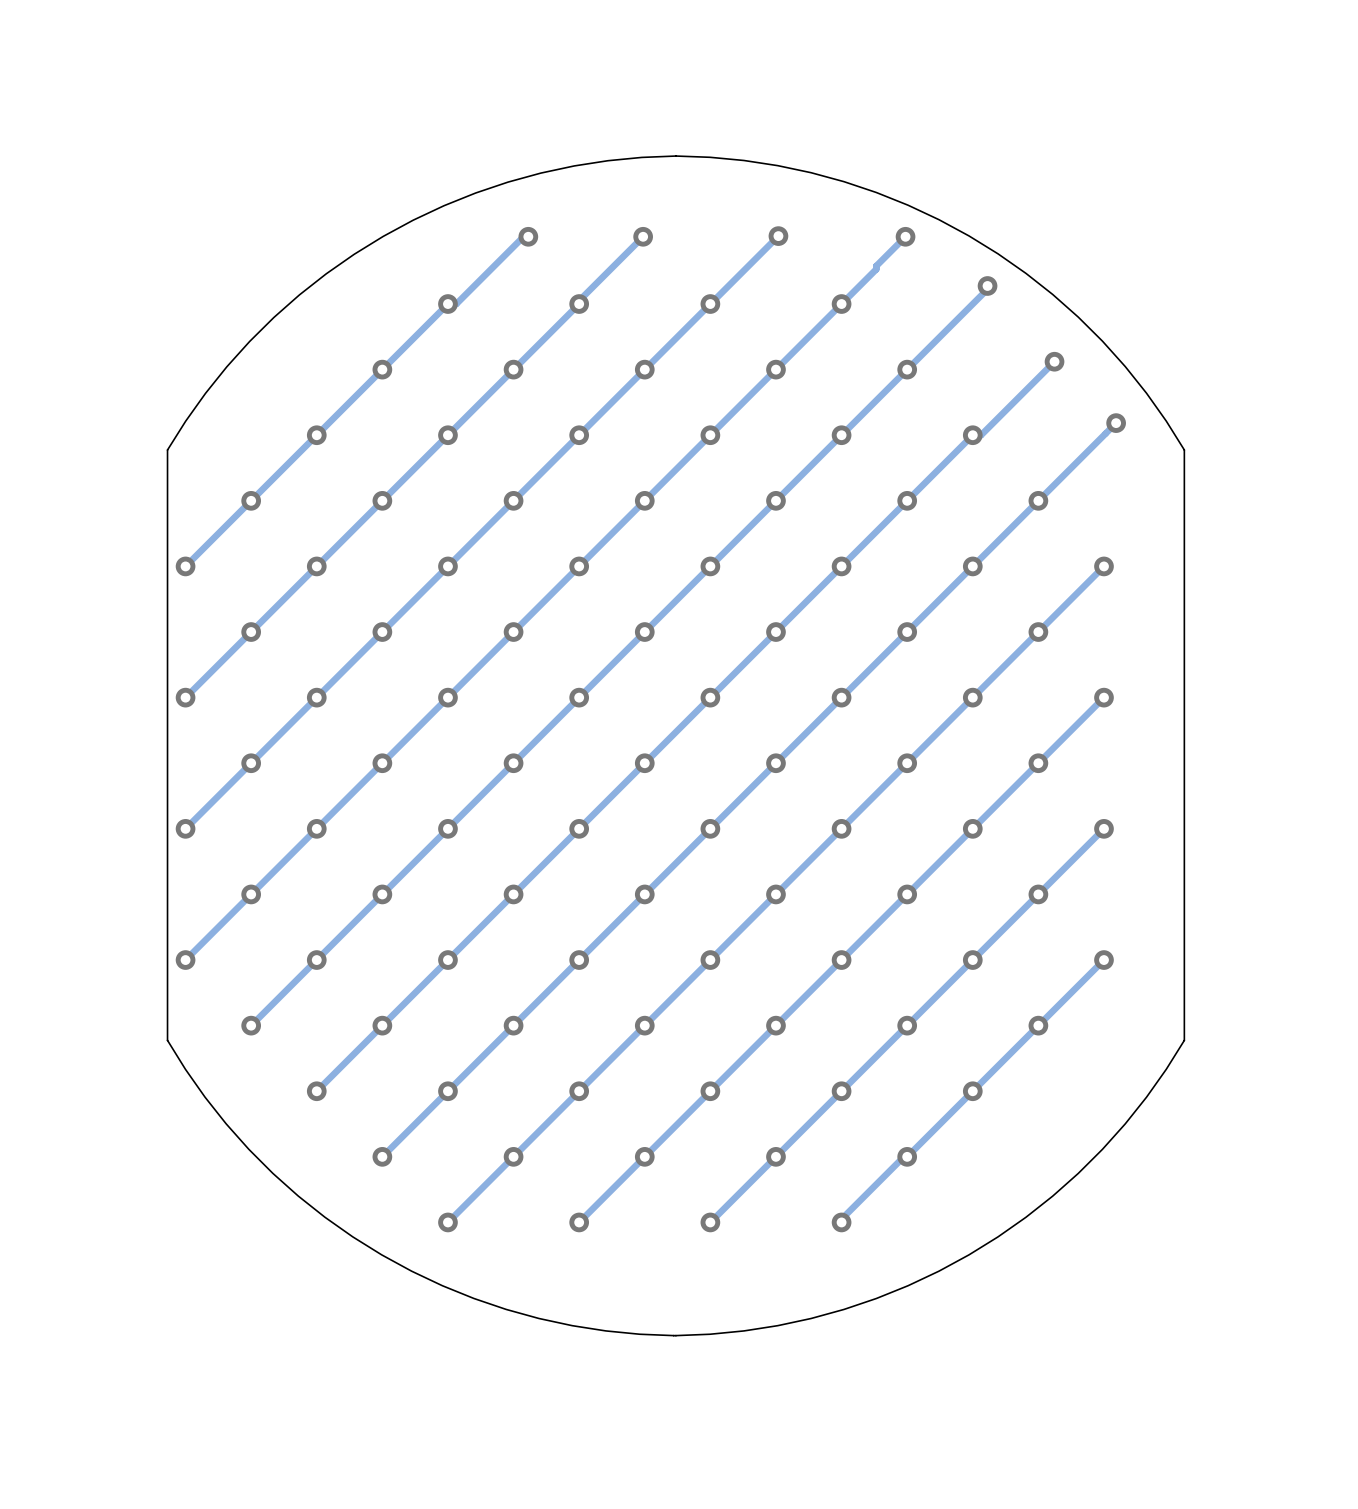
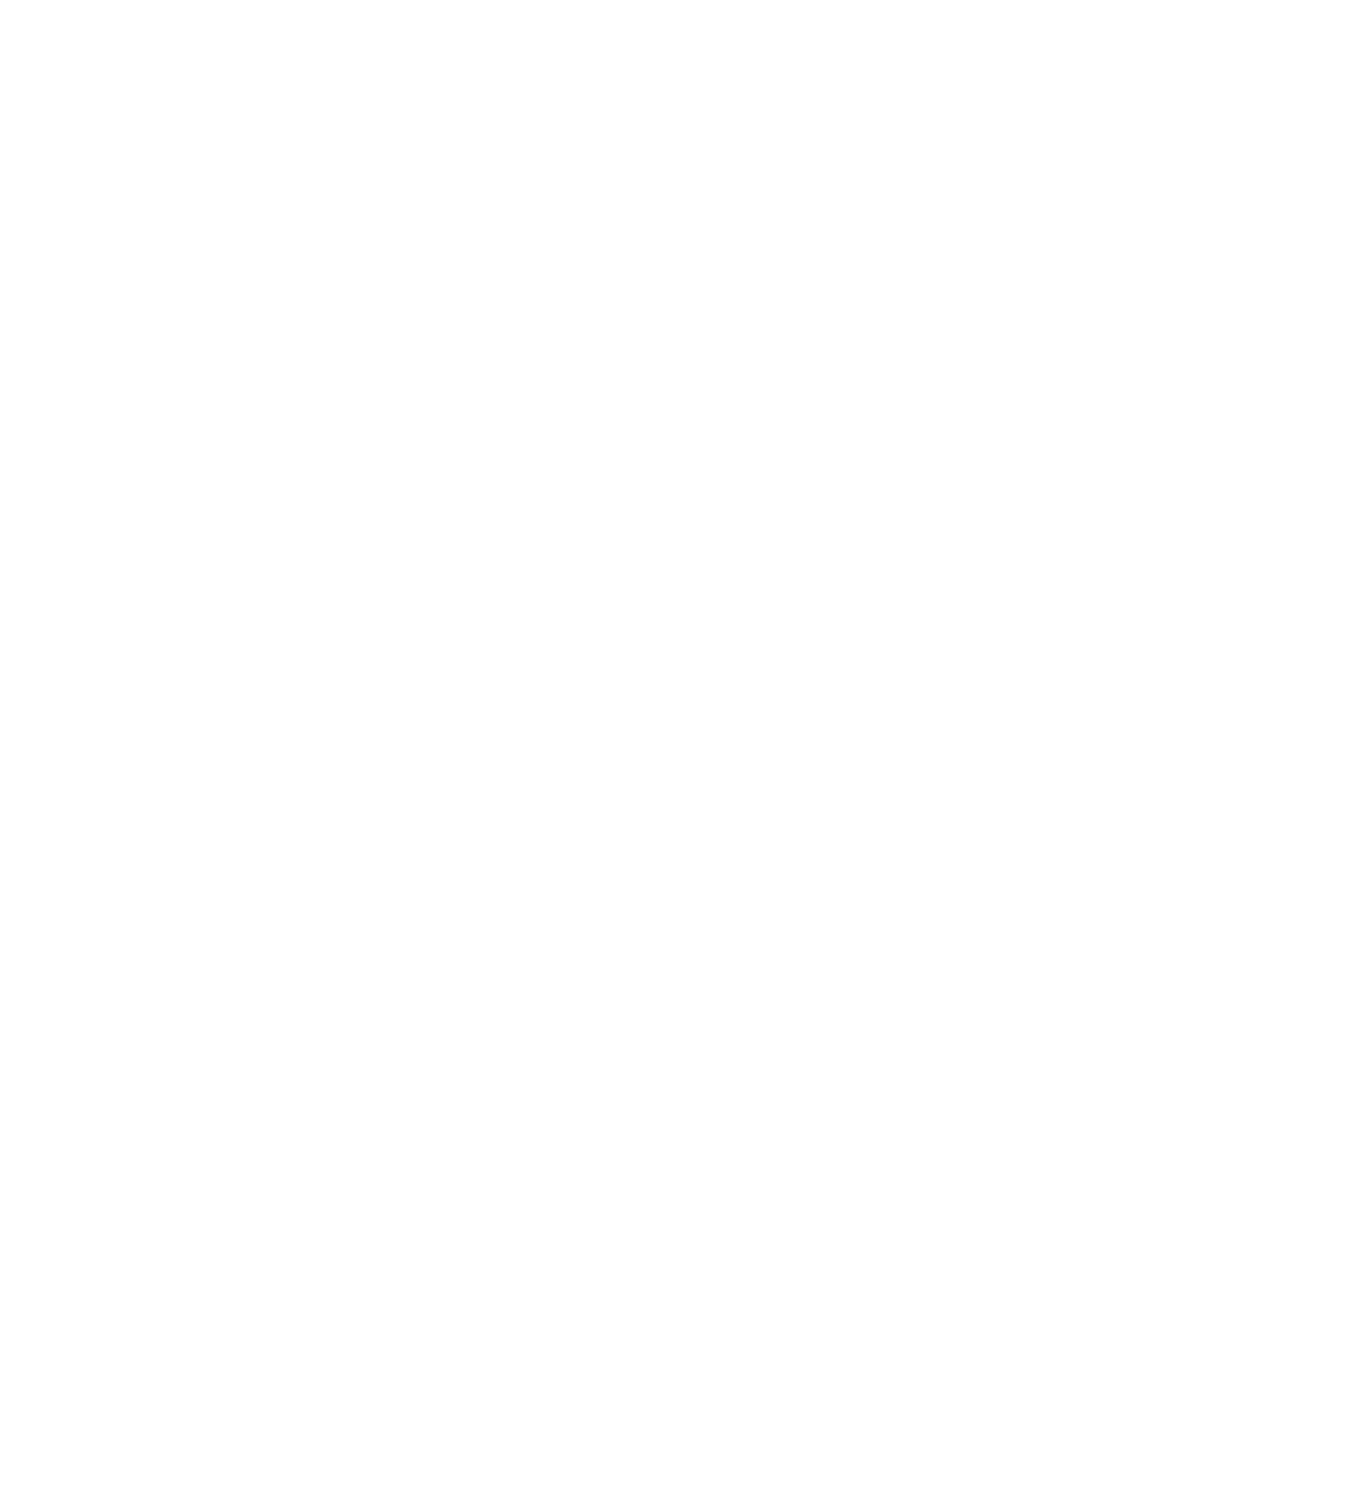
board edge: (675, 156) (744, 160) (811, 172) (876, 192) (938, 219) (968, 235) (1025, 273) (1052, 294) (1102, 341) (1146, 393) (1184, 449) (1184, 1040) (1146, 1097) (1102, 1149) (1052, 1196) (997, 1236) (968, 1254) (938, 1271) (876, 1298) (811, 1318) (744, 1330) (673, 1335) (605, 1330) (572, 1325) (506, 1309) (442, 1285) (381, 1254) (324, 1217) (272, 1173) (226, 1123) (205, 1097) (167, 1040) (167, 449) (205, 393) (226, 366) (273, 317) (326, 273) (383, 236) (444, 205) (508, 182) (540, 173) (607, 160) (675, 156) -> none
track: (528, 236) (523, 236) (456, 304) (447, 304) (185, 566) -> none
via: (528, 236) -> none
track: (643, 236) (579, 300) (579, 304) (185, 697) -> none
via: (643, 236) -> none
track: (778, 236) (185, 828) -> none
via: (778, 236) -> none
track: (905, 236) (876, 266) (876, 269) (185, 960) -> none
via: (905, 236) -> none
track: (987, 285) (987, 289) (251, 1025) -> none
via: (987, 285) -> none
via: (447, 304) -> none
via: (579, 304) -> none
via: (710, 304) -> none
via: (841, 304) -> none
track: (1054, 361) (981, 435) (972, 435) (316, 1091) -> none
via: (1054, 361) -> none
via: (382, 369) -> none
via: (513, 369) -> none
via: (644, 369) -> none
via: (775, 369) -> none
via: (907, 369) -> none
track: (1116, 423) (382, 1156) -> none
via: (1116, 423) -> none
via: (316, 435) -> none
via: (447, 435) -> none
via: (579, 435) -> none
via: (710, 435) -> none
via: (841, 435) -> none
via: (972, 435) -> none
via: (251, 500) -> none
via: (382, 500) -> none
via: (513, 500) -> none
via: (644, 500) -> none
via: (775, 500) -> none
via: (907, 500) -> none
via: (1038, 500) -> none
via: (185, 566) -> none
via: (316, 566) -> none
via: (447, 566) -> none
via: (579, 566) -> none
via: (710, 566) -> none
via: (841, 566) -> none
via: (972, 566) -> none
track: (1103, 566) (447, 1222) -> none
via: (1103, 566) -> none
via: (251, 632) -> none
via: (382, 632) -> none
via: (513, 632) -> none
via: (644, 632) -> none
via: (775, 632) -> none
via: (907, 632) -> none
via: (1038, 632) -> none
via: (185, 697) -> none
via: (316, 697) -> none
via: (447, 697) -> none
via: (579, 697) -> none
via: (710, 697) -> none
via: (841, 697) -> none
via: (972, 697) -> none
track: (1103, 697) (579, 1222) -> none
via: (1103, 697) -> none
via: (251, 763) -> none
via: (382, 763) -> none
via: (513, 763) -> none
via: (644, 763) -> none
via: (775, 763) -> none
via: (907, 763) -> none
via: (1038, 763) -> none
via: (185, 828) -> none
via: (316, 828) -> none
via: (447, 828) -> none
via: (579, 828) -> none
via: (710, 828) -> none
via: (841, 828) -> none
via: (972, 828) -> none
track: (1103, 828) (710, 1222) -> none
via: (1103, 828) -> none
via: (251, 894) -> none
via: (382, 894) -> none
via: (513, 894) -> none
via: (644, 894) -> none
via: (775, 894) -> none
via: (907, 894) -> none
via: (1038, 894) -> none
via: (185, 960) -> none
via: (316, 960) -> none
via: (447, 960) -> none
via: (579, 960) -> none
via: (710, 960) -> none
via: (841, 960) -> none
via: (972, 960) -> none
track: (1103, 960) (907, 1156) (905, 1155) (841, 1219) (841, 1222) -> none
via: (1103, 960) -> none
via: (251, 1025) -> none
via: (382, 1025) -> none
via: (513, 1025) -> none
via: (644, 1025) -> none
via: (775, 1025) -> none
via: (907, 1025) -> none
via: (1038, 1025) -> none
via: (316, 1091) -> none
via: (447, 1091) -> none
via: (579, 1091) -> none
via: (710, 1091) -> none
via: (841, 1091) -> none
via: (972, 1091) -> none
via: (382, 1156) -> none
via: (513, 1156) -> none
via: (644, 1156) -> none
via: (775, 1156) -> none
via: (907, 1156) -> none
via: (447, 1222) -> none
via: (579, 1222) -> none
via: (710, 1222) -> none
via: (841, 1222) -> none

